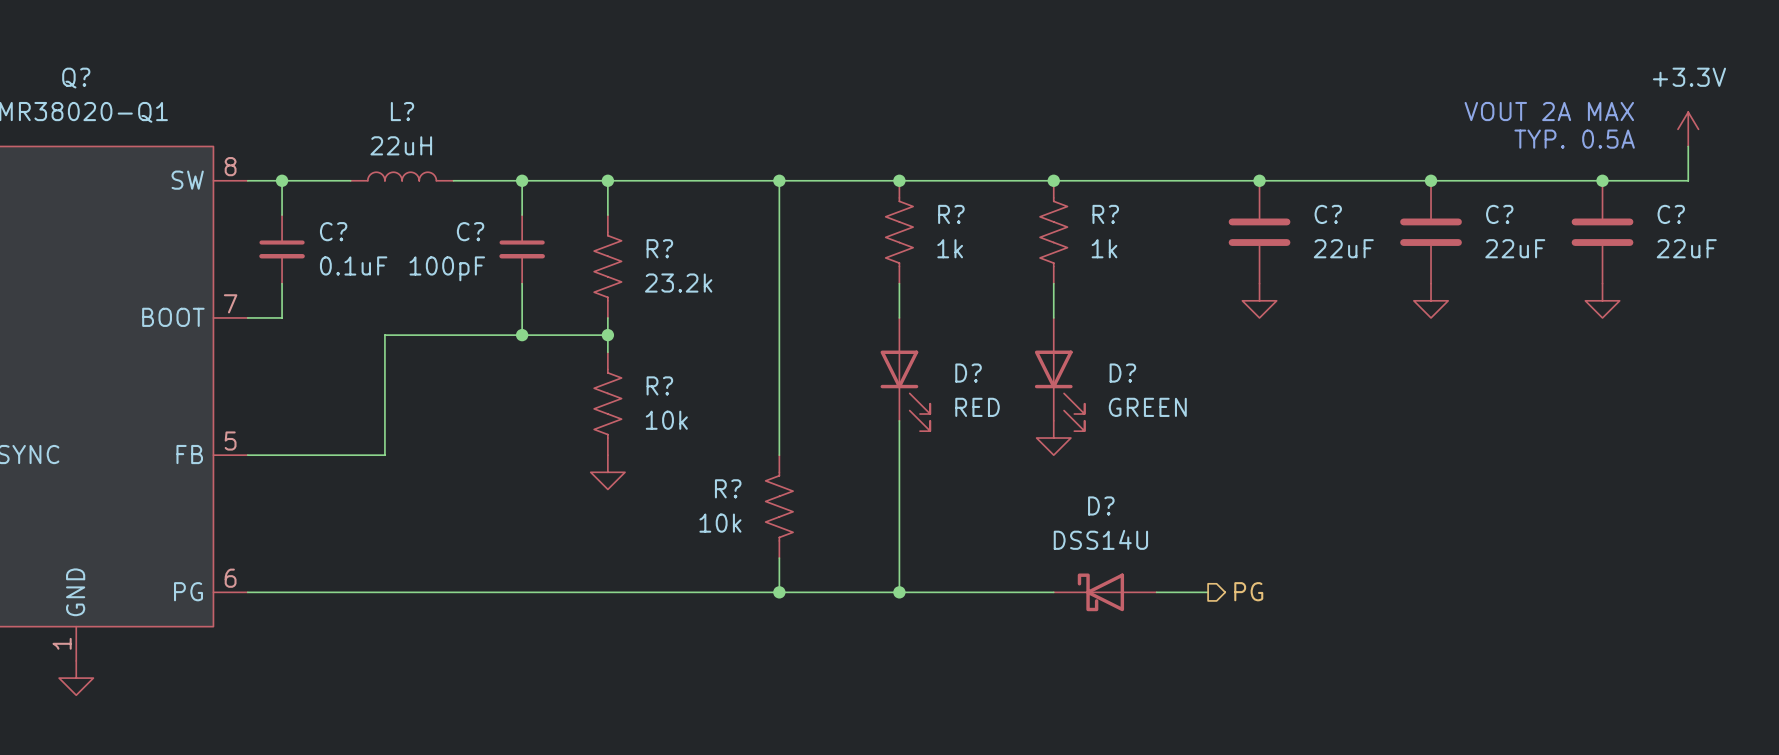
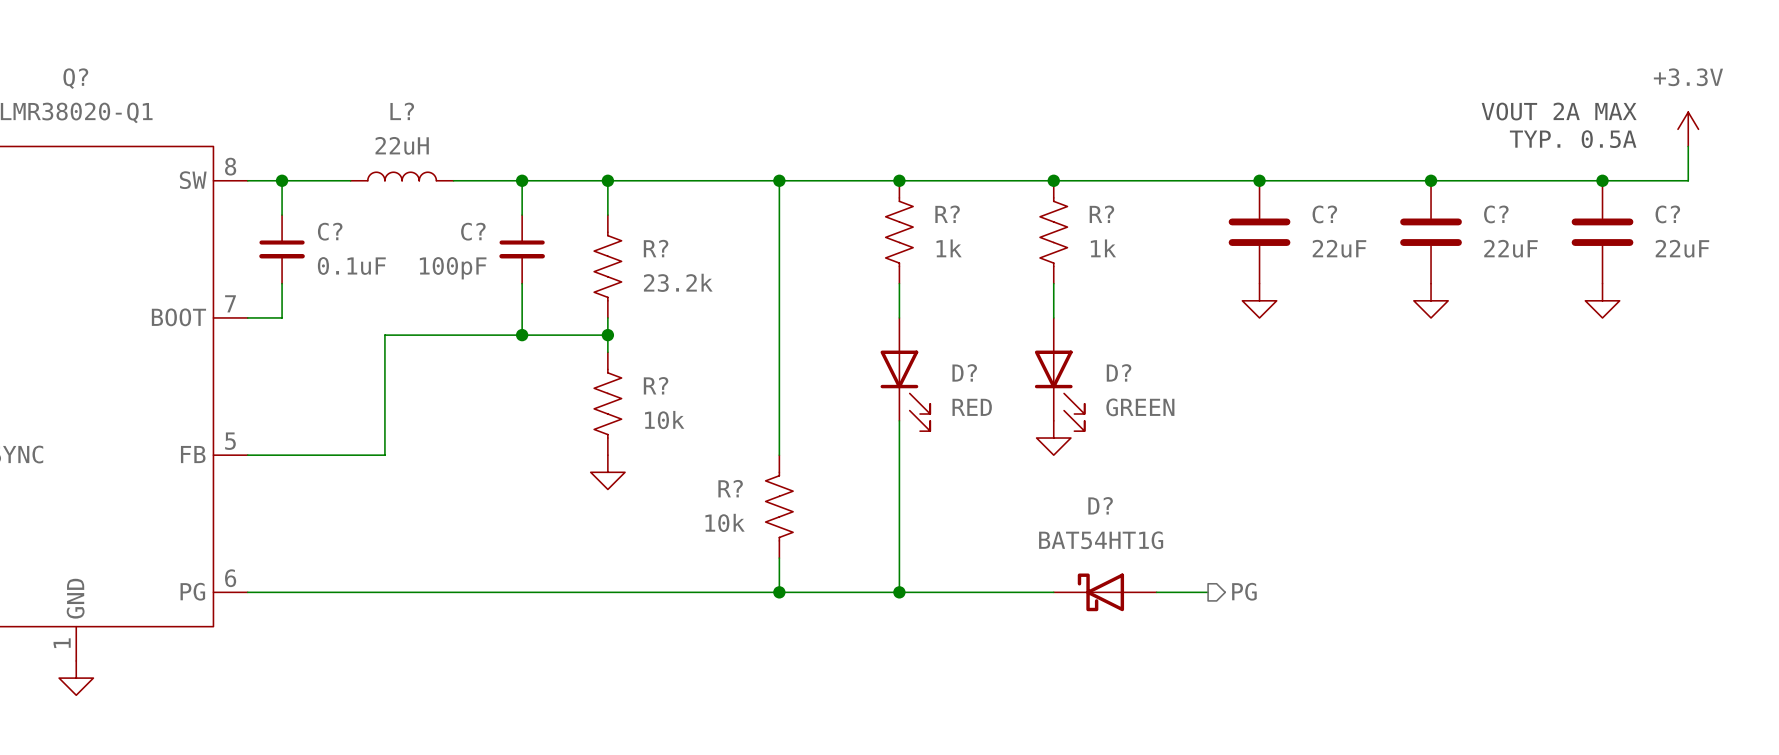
D? value: DSS14U (1100, 539) -> BAT54HT1G (1101, 540)

